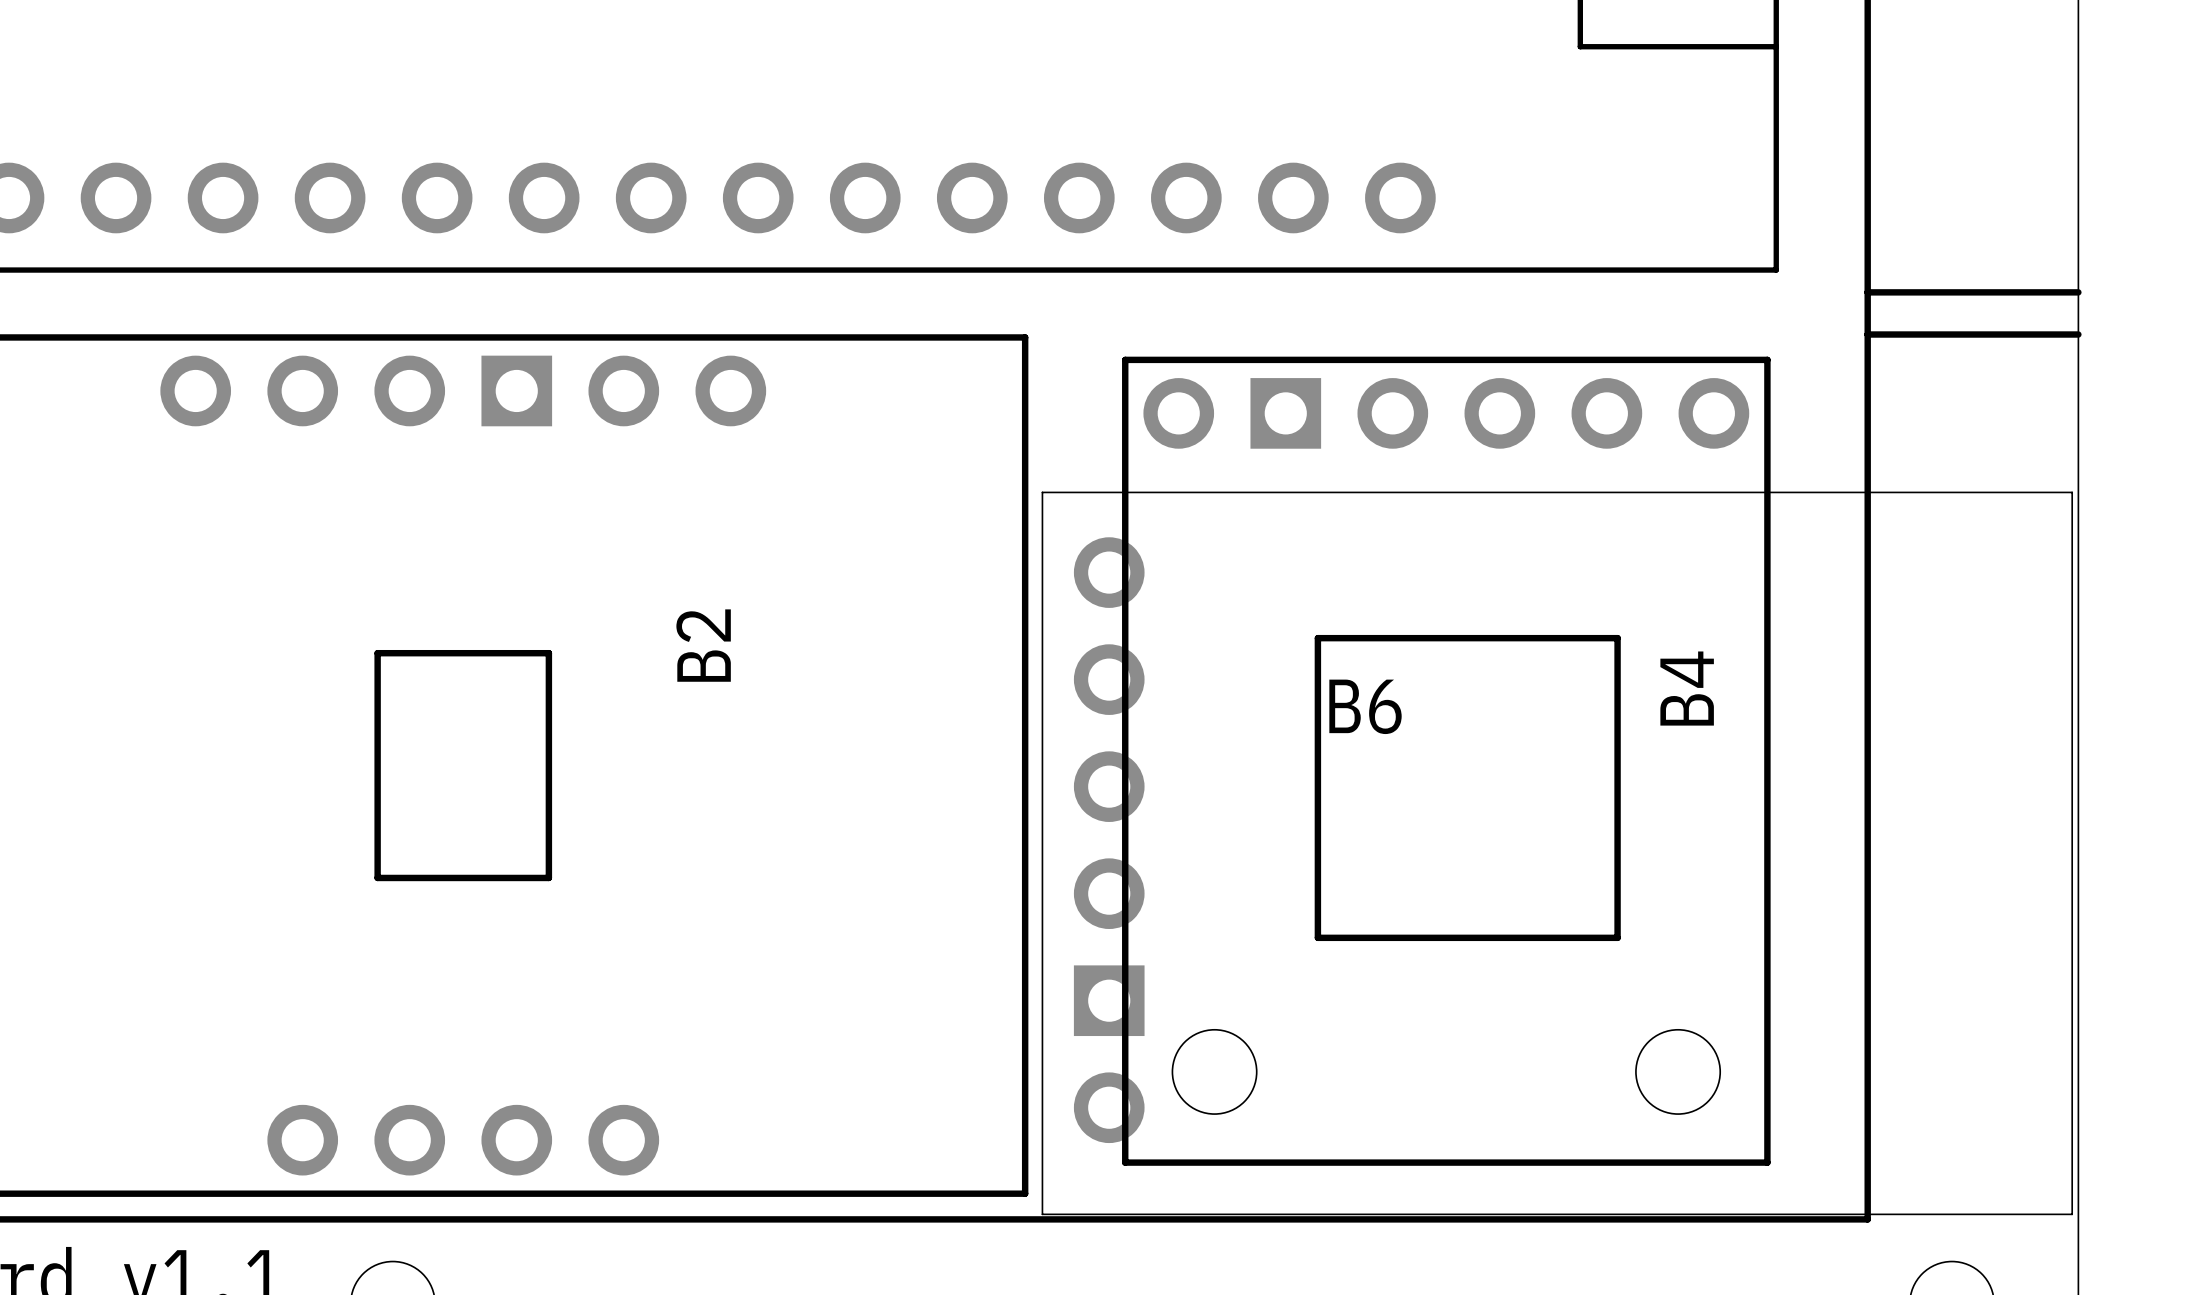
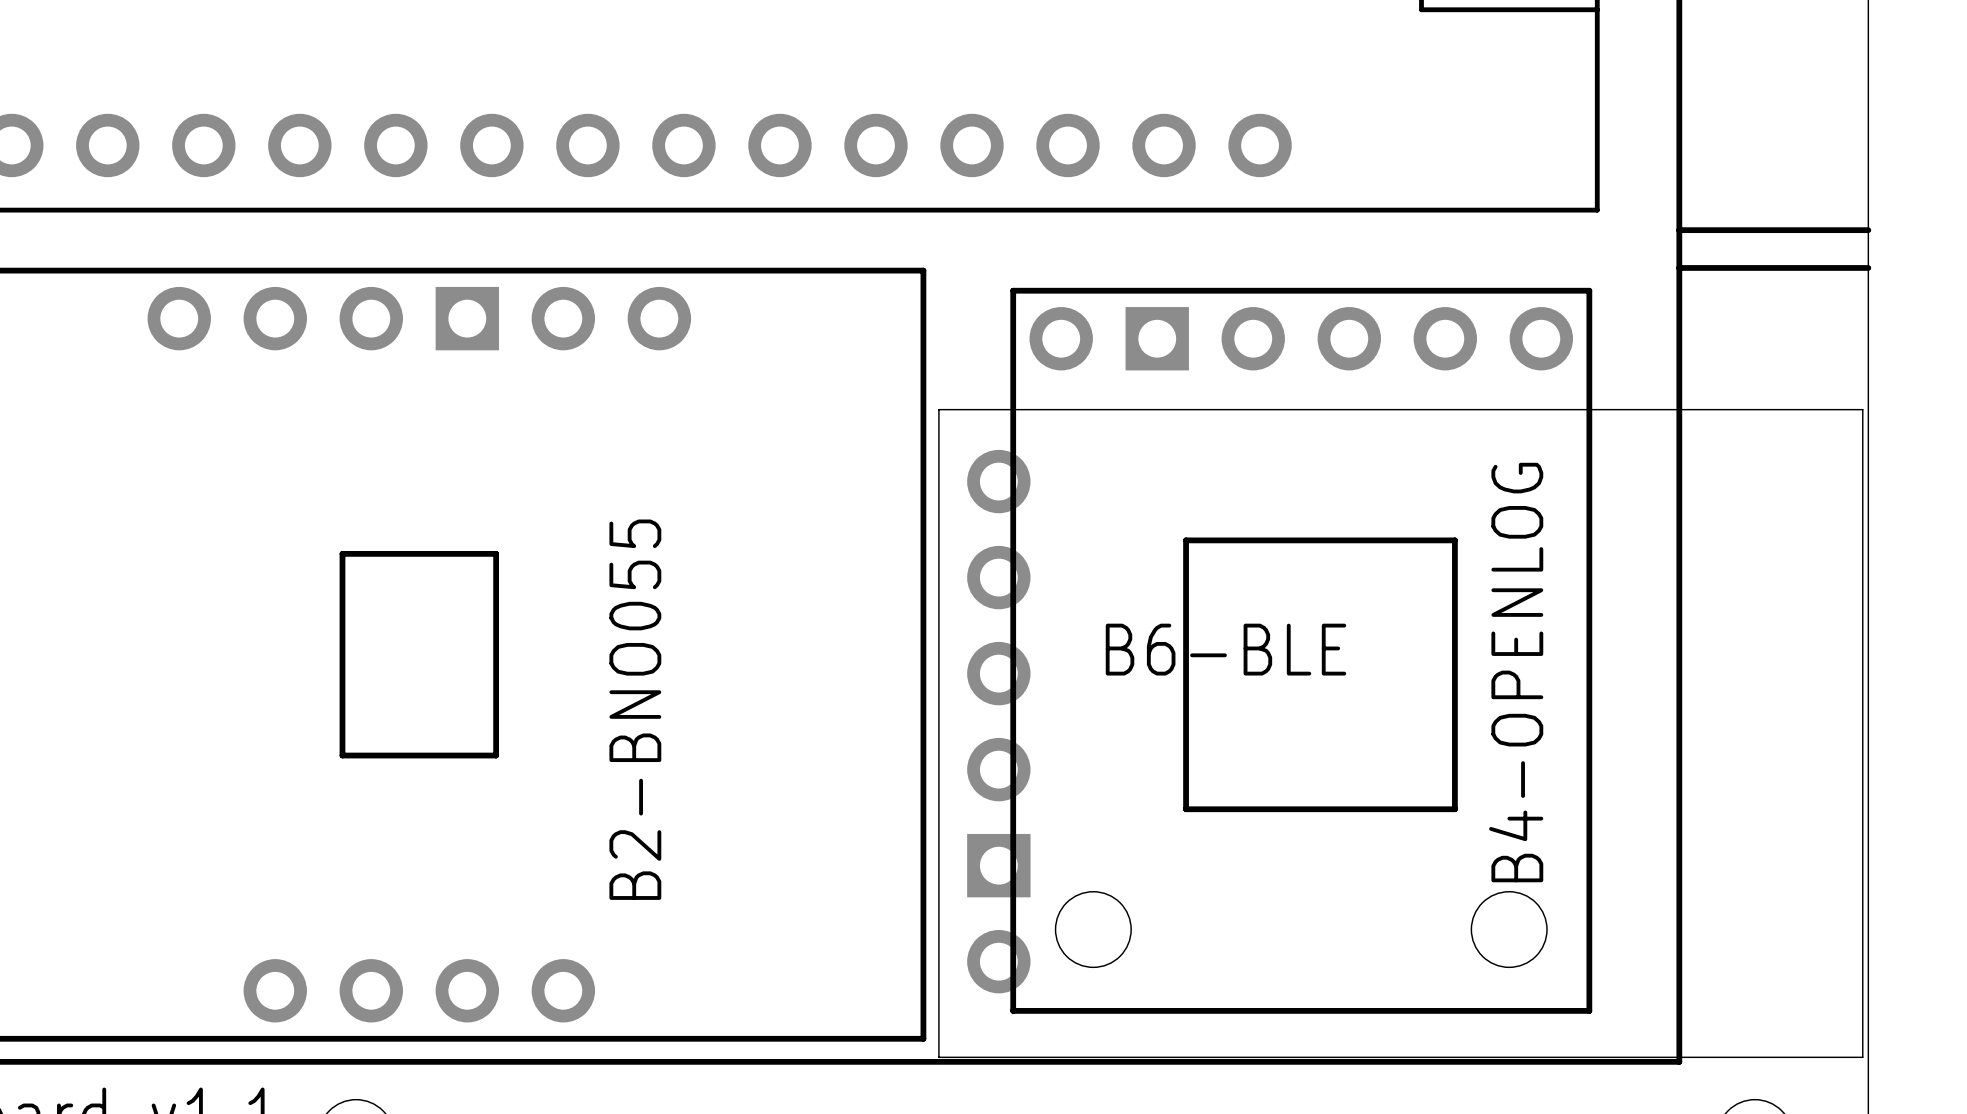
B2 name: B2 (703, 645) -> B2-BNO055 (635, 709)
B4 name: B4 (1687, 688) -> B4-OPENLOG (1516, 672)
B6 name: B6 (1365, 706) -> B6-BLE (1225, 649)

